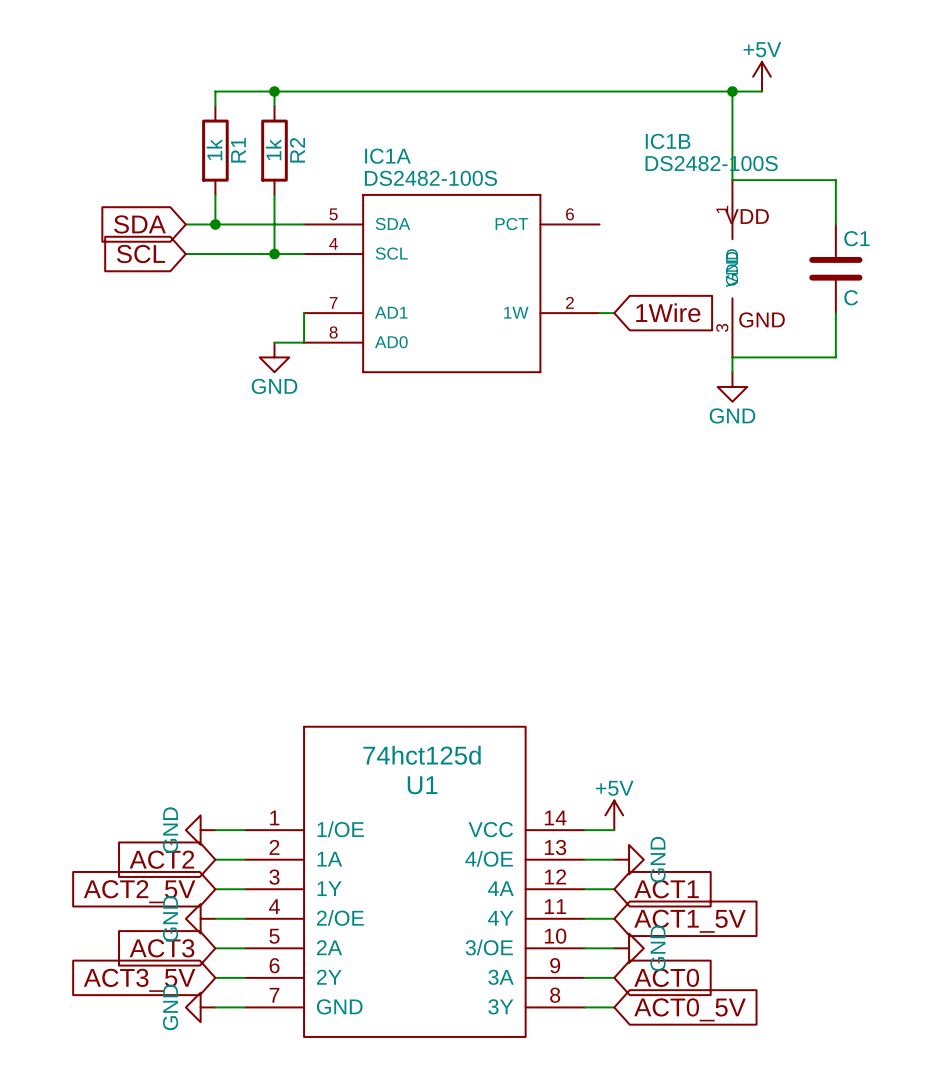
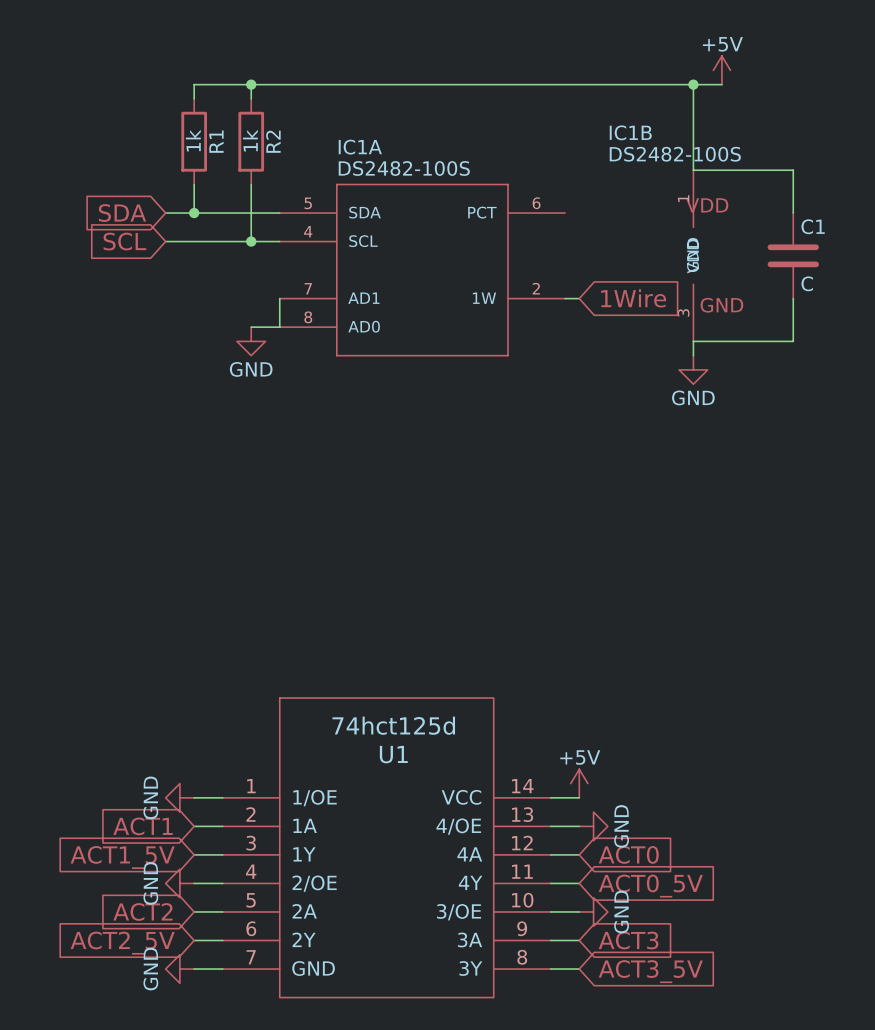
global label: ACT2 (161, 859) -> ACT1 (143, 826)
global label: ACT1 (666, 889) -> ACT0 (628, 854)
global label: ACT2_5V (139, 891) -> ACT1_5V (122, 857)
global label: ACT1_5V (690, 921) -> ACT0_5V (650, 886)
global label: ACT3 (161, 948) -> ACT2 (142, 911)
global label: ACT0 (666, 977) -> ACT3 (628, 940)
global label: ACT3_5V (139, 980) -> ACT2_5V (122, 943)
global label: ACT0_5V (690, 1009) -> ACT3_5V (650, 971)

